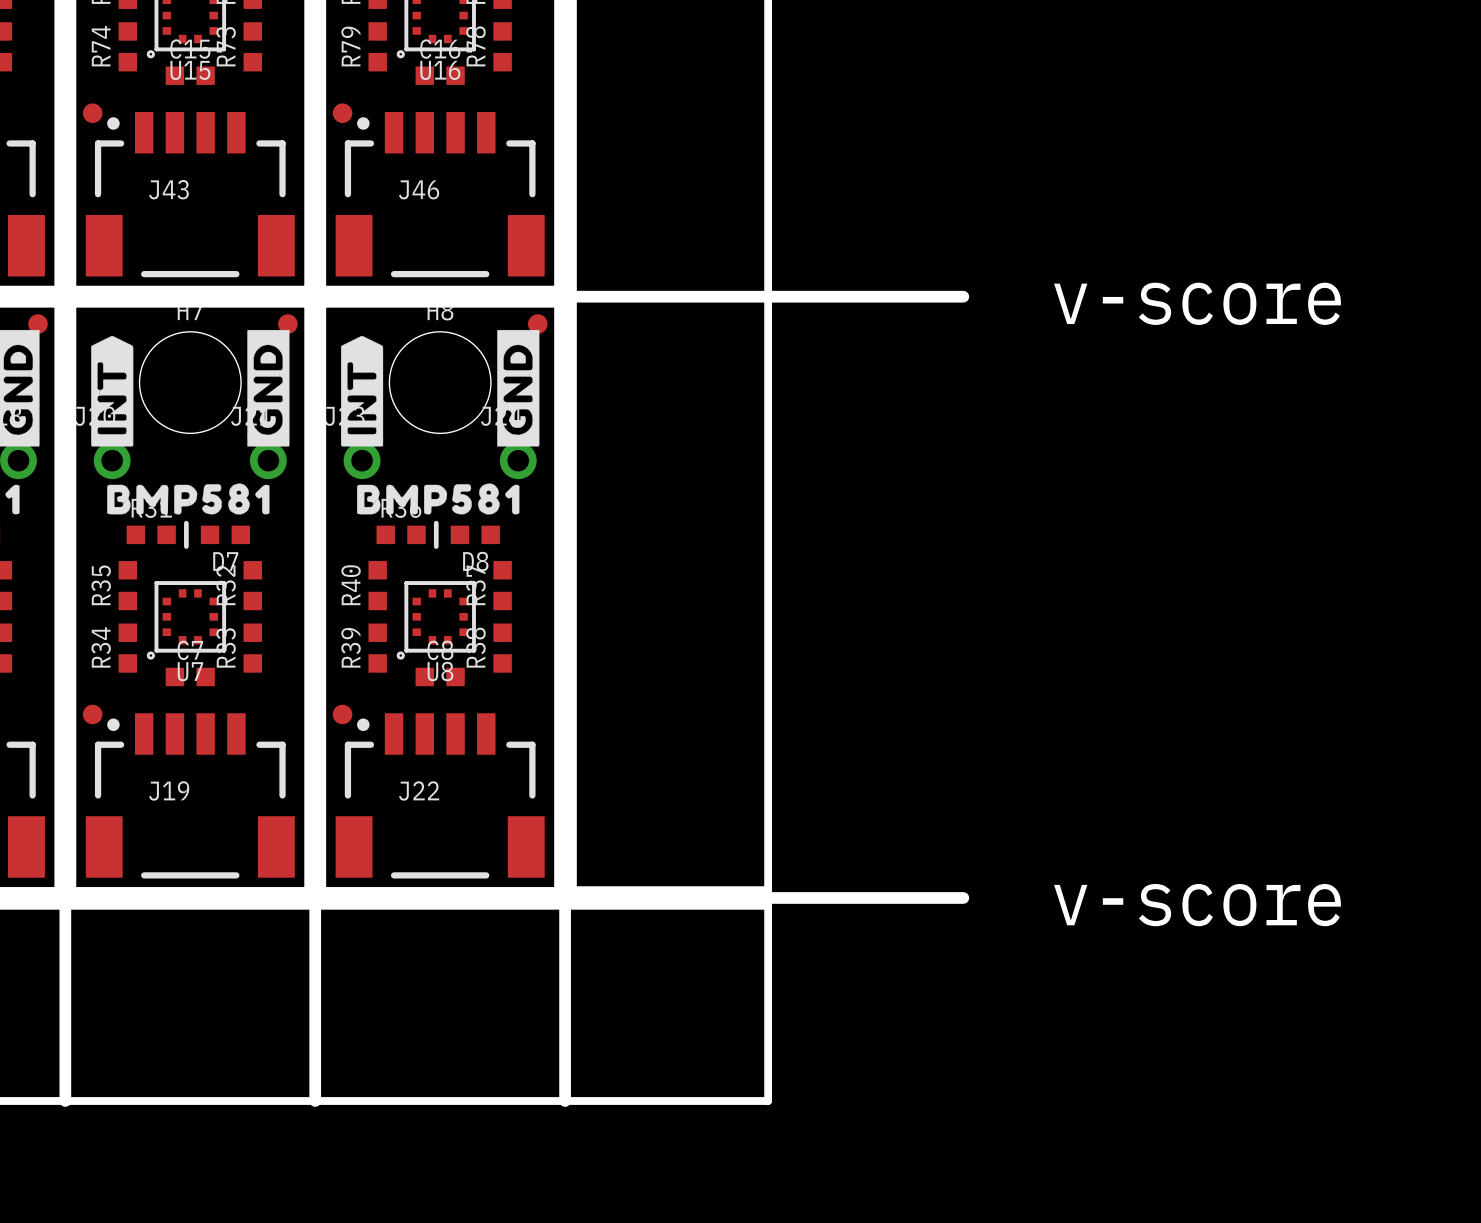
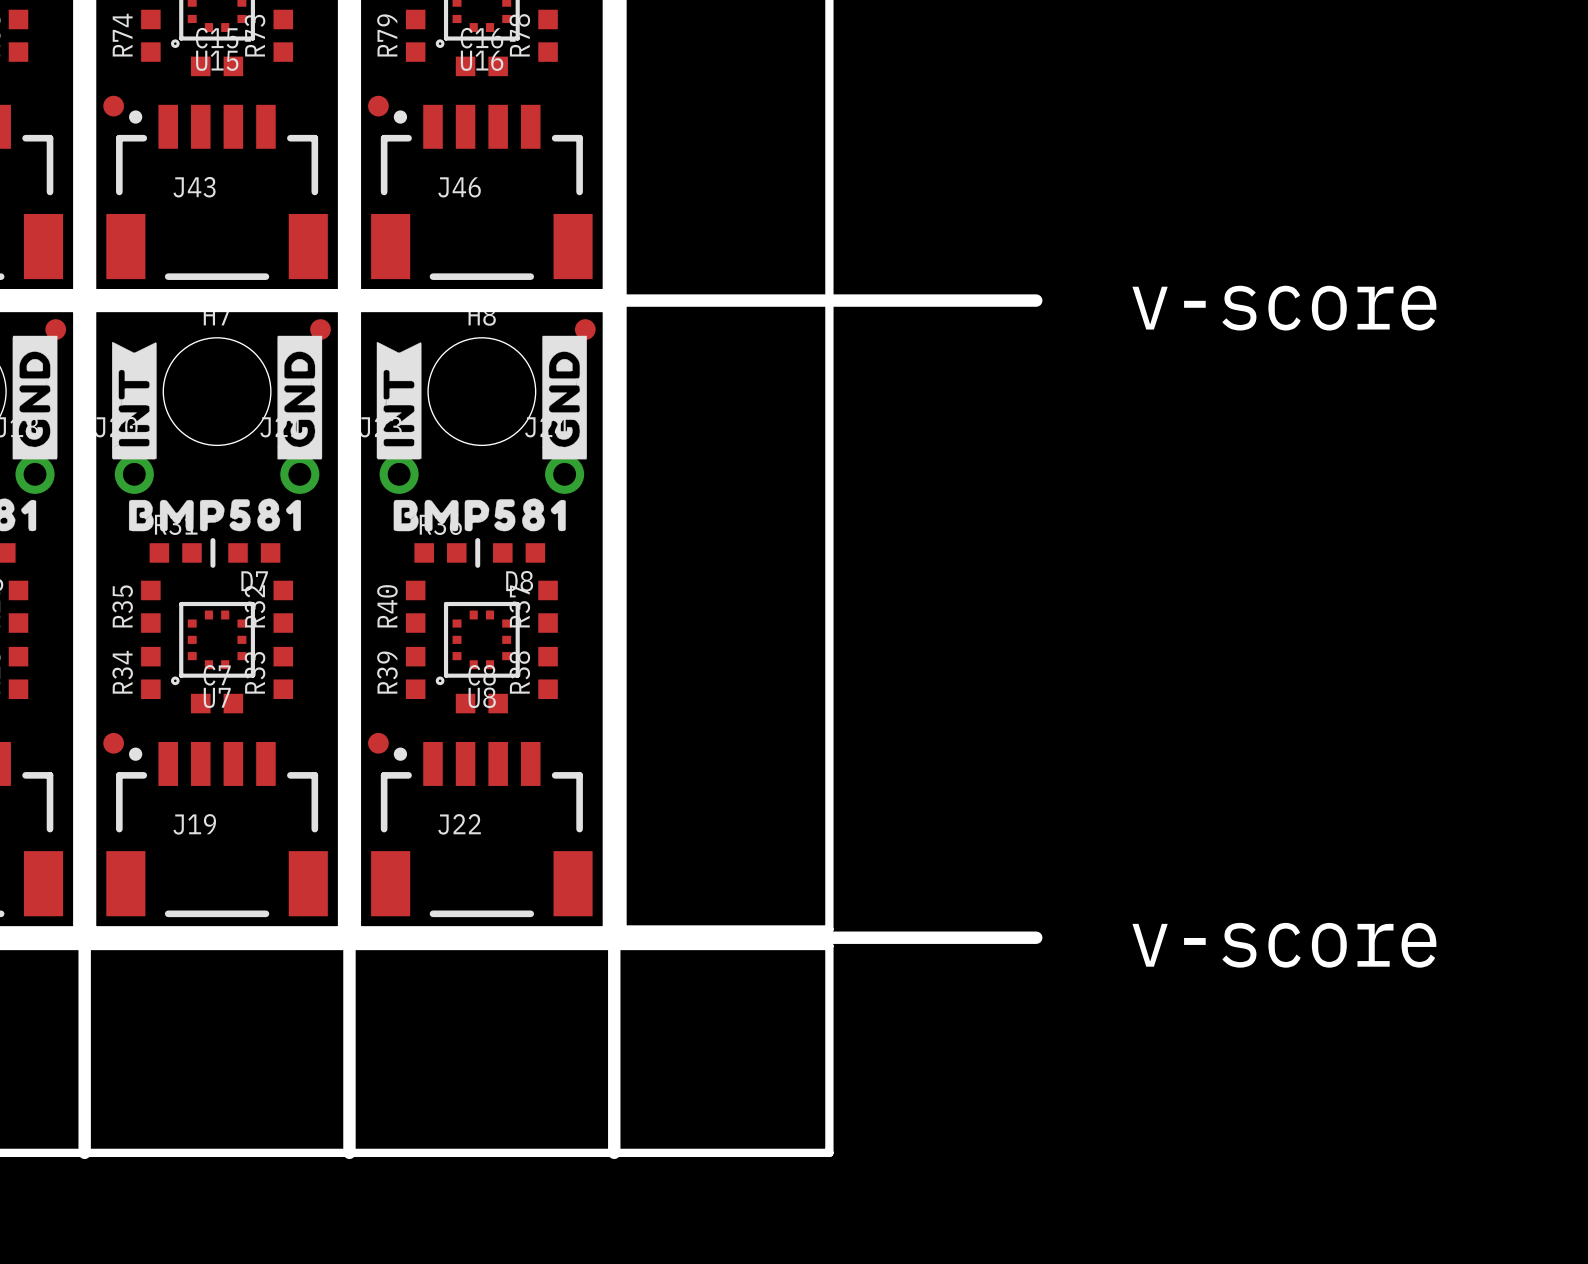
drawing shape: [91, 335, 134, 447] -> [112, 342, 157, 460]
drawing shape: [341, 335, 384, 447] -> [376, 342, 422, 460]

